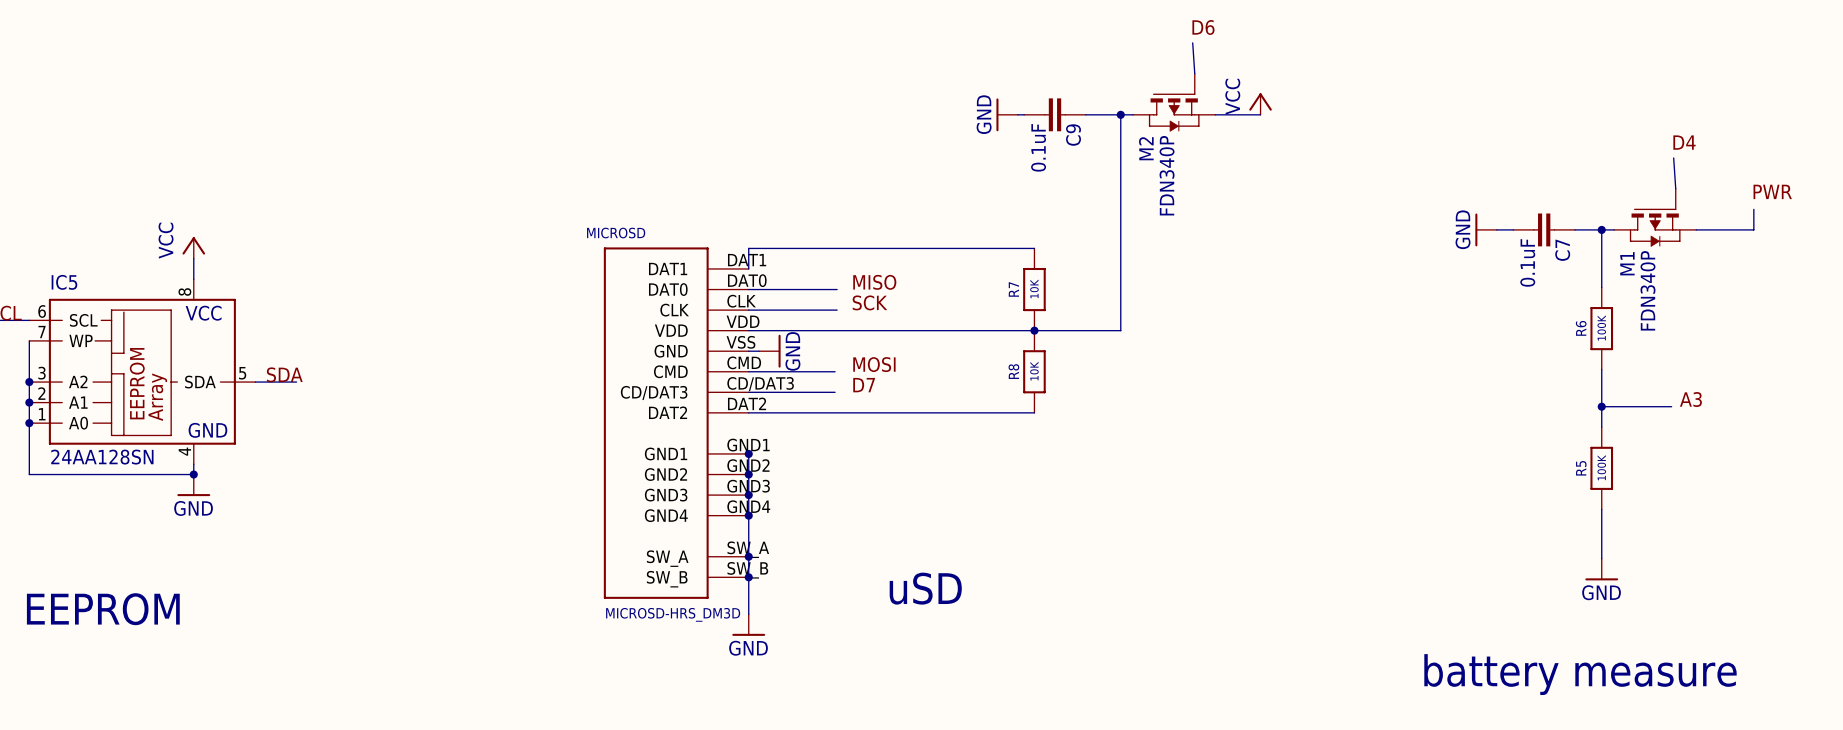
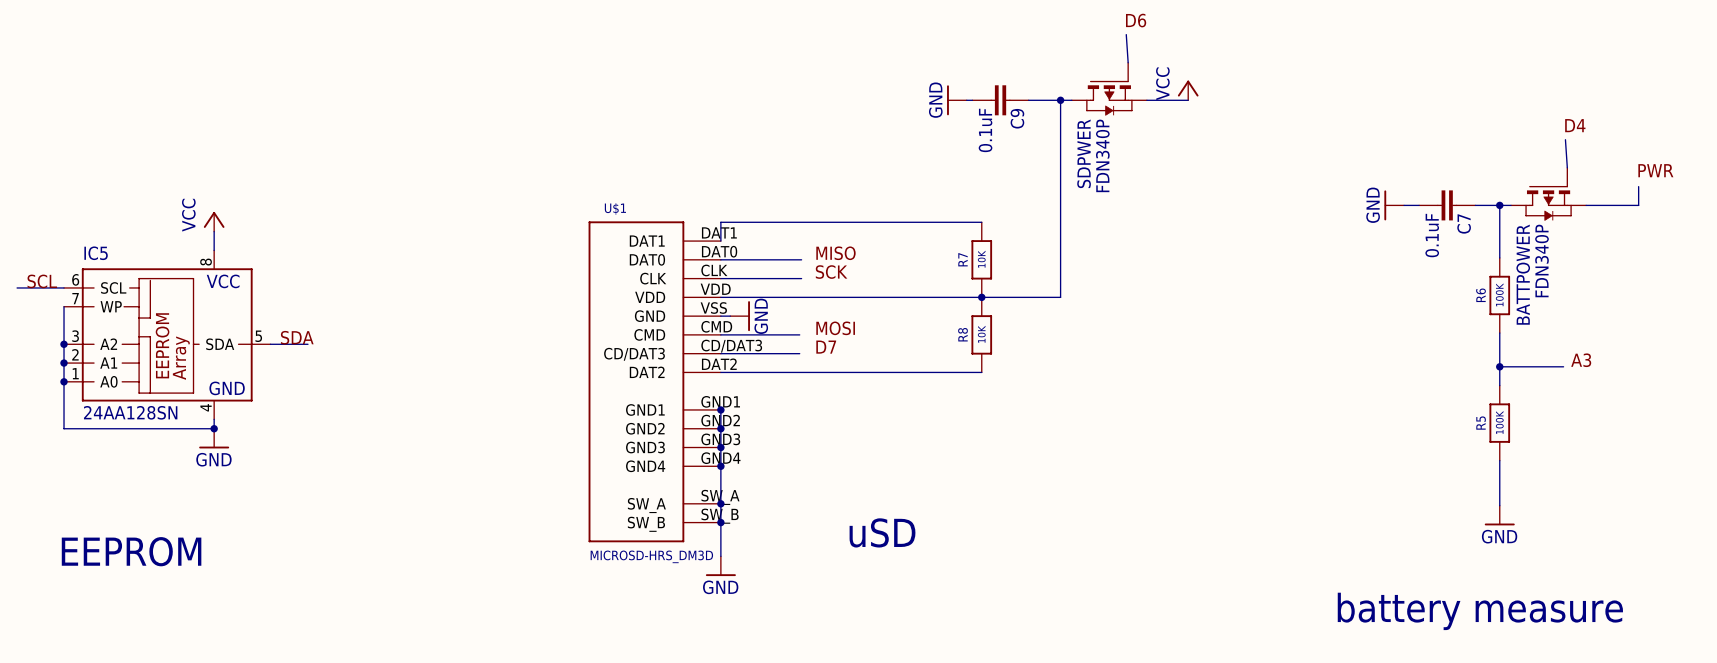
M2 name: M2 (1146, 148) -> SDPWER (1084, 153)
MICROSD name: MICROSD (616, 233) -> U$1 (615, 208)
M1 name: M1 (1627, 263) -> BATTPOWER (1523, 274)

